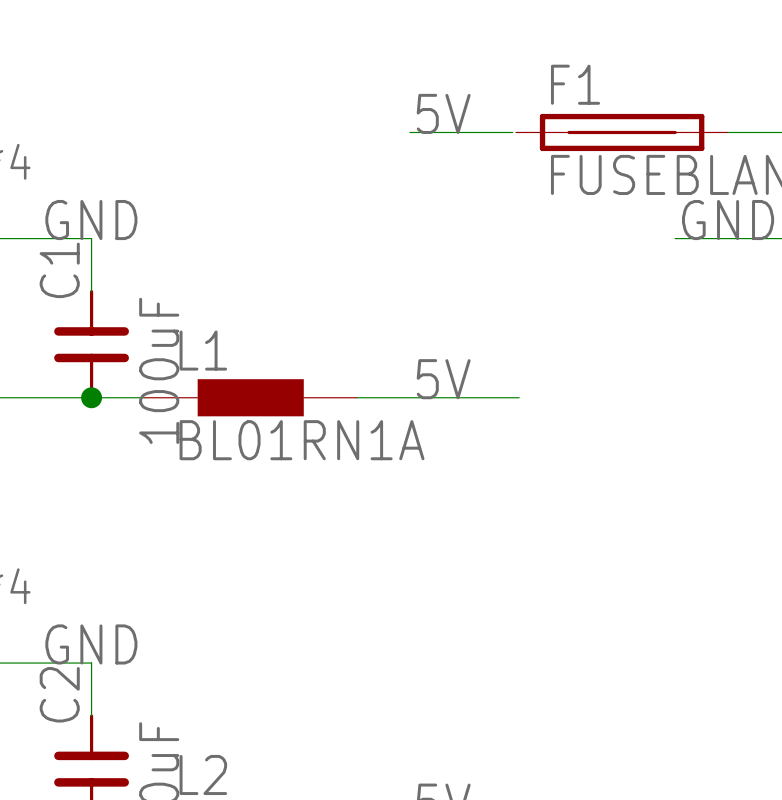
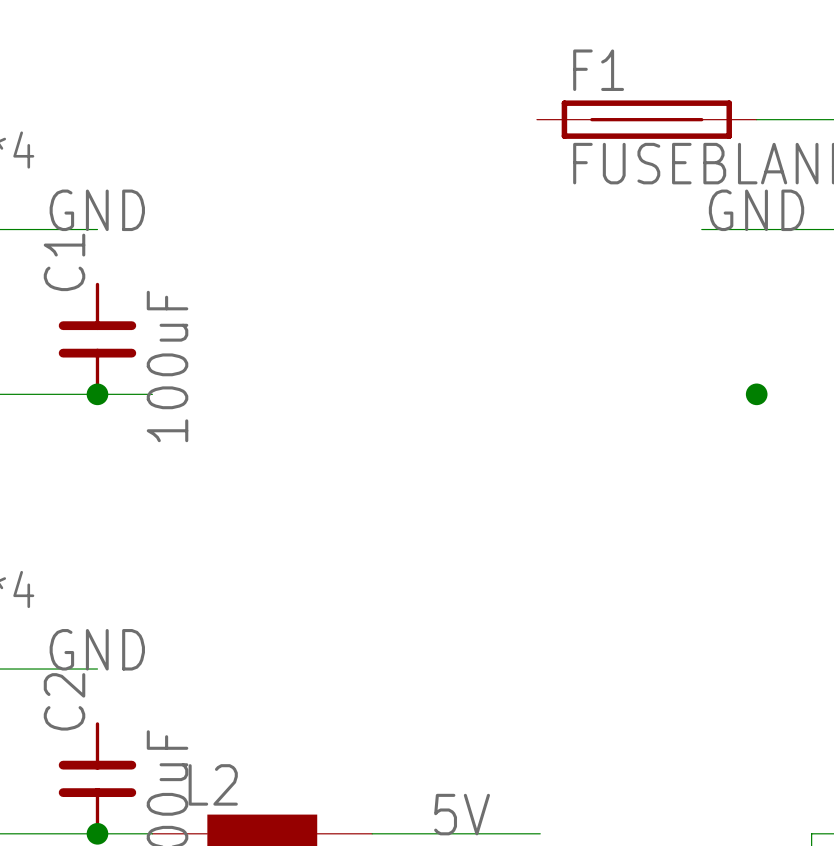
label: 5V (443, 113) -> none
wire: (409, 132) (512, 132) -> none
wire: (91, 238) (91, 291) -> none
label: 5V (443, 379) -> none
L1: BL01RN1A (250, 397) -> none
wire: (356, 397) (519, 397) -> none
junction: none -> (756, 394)
wire: (91, 663) (91, 716) -> none

